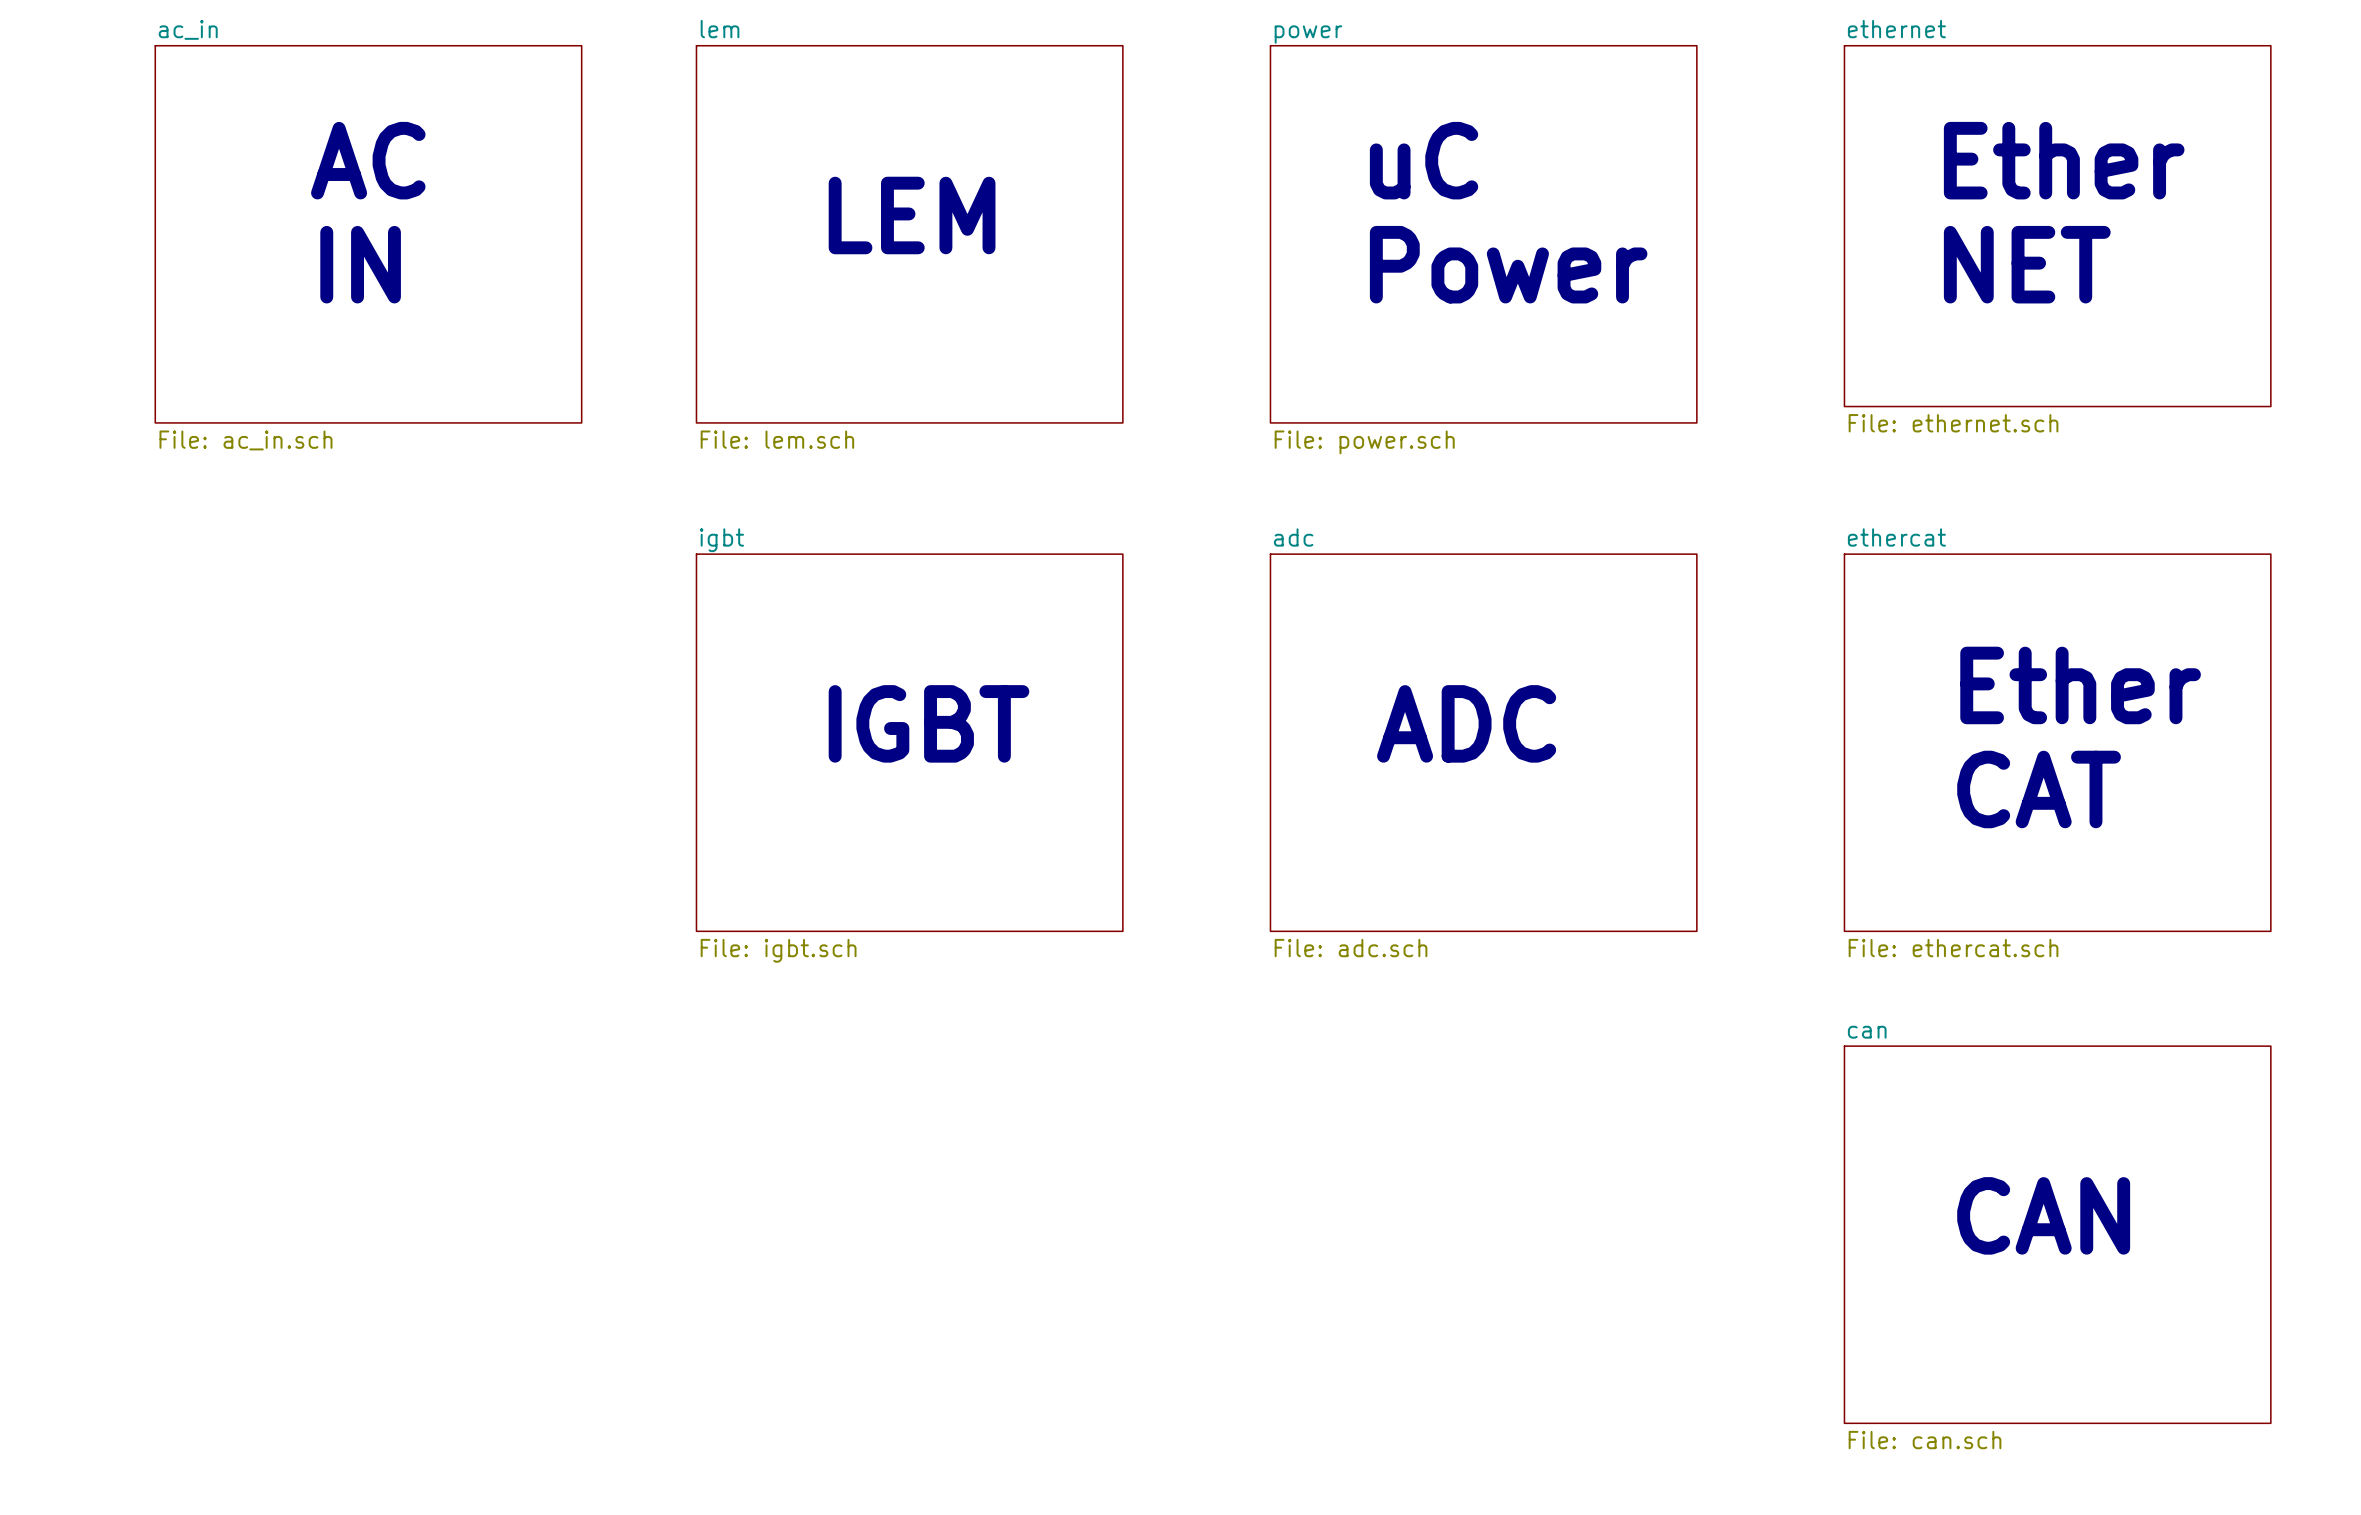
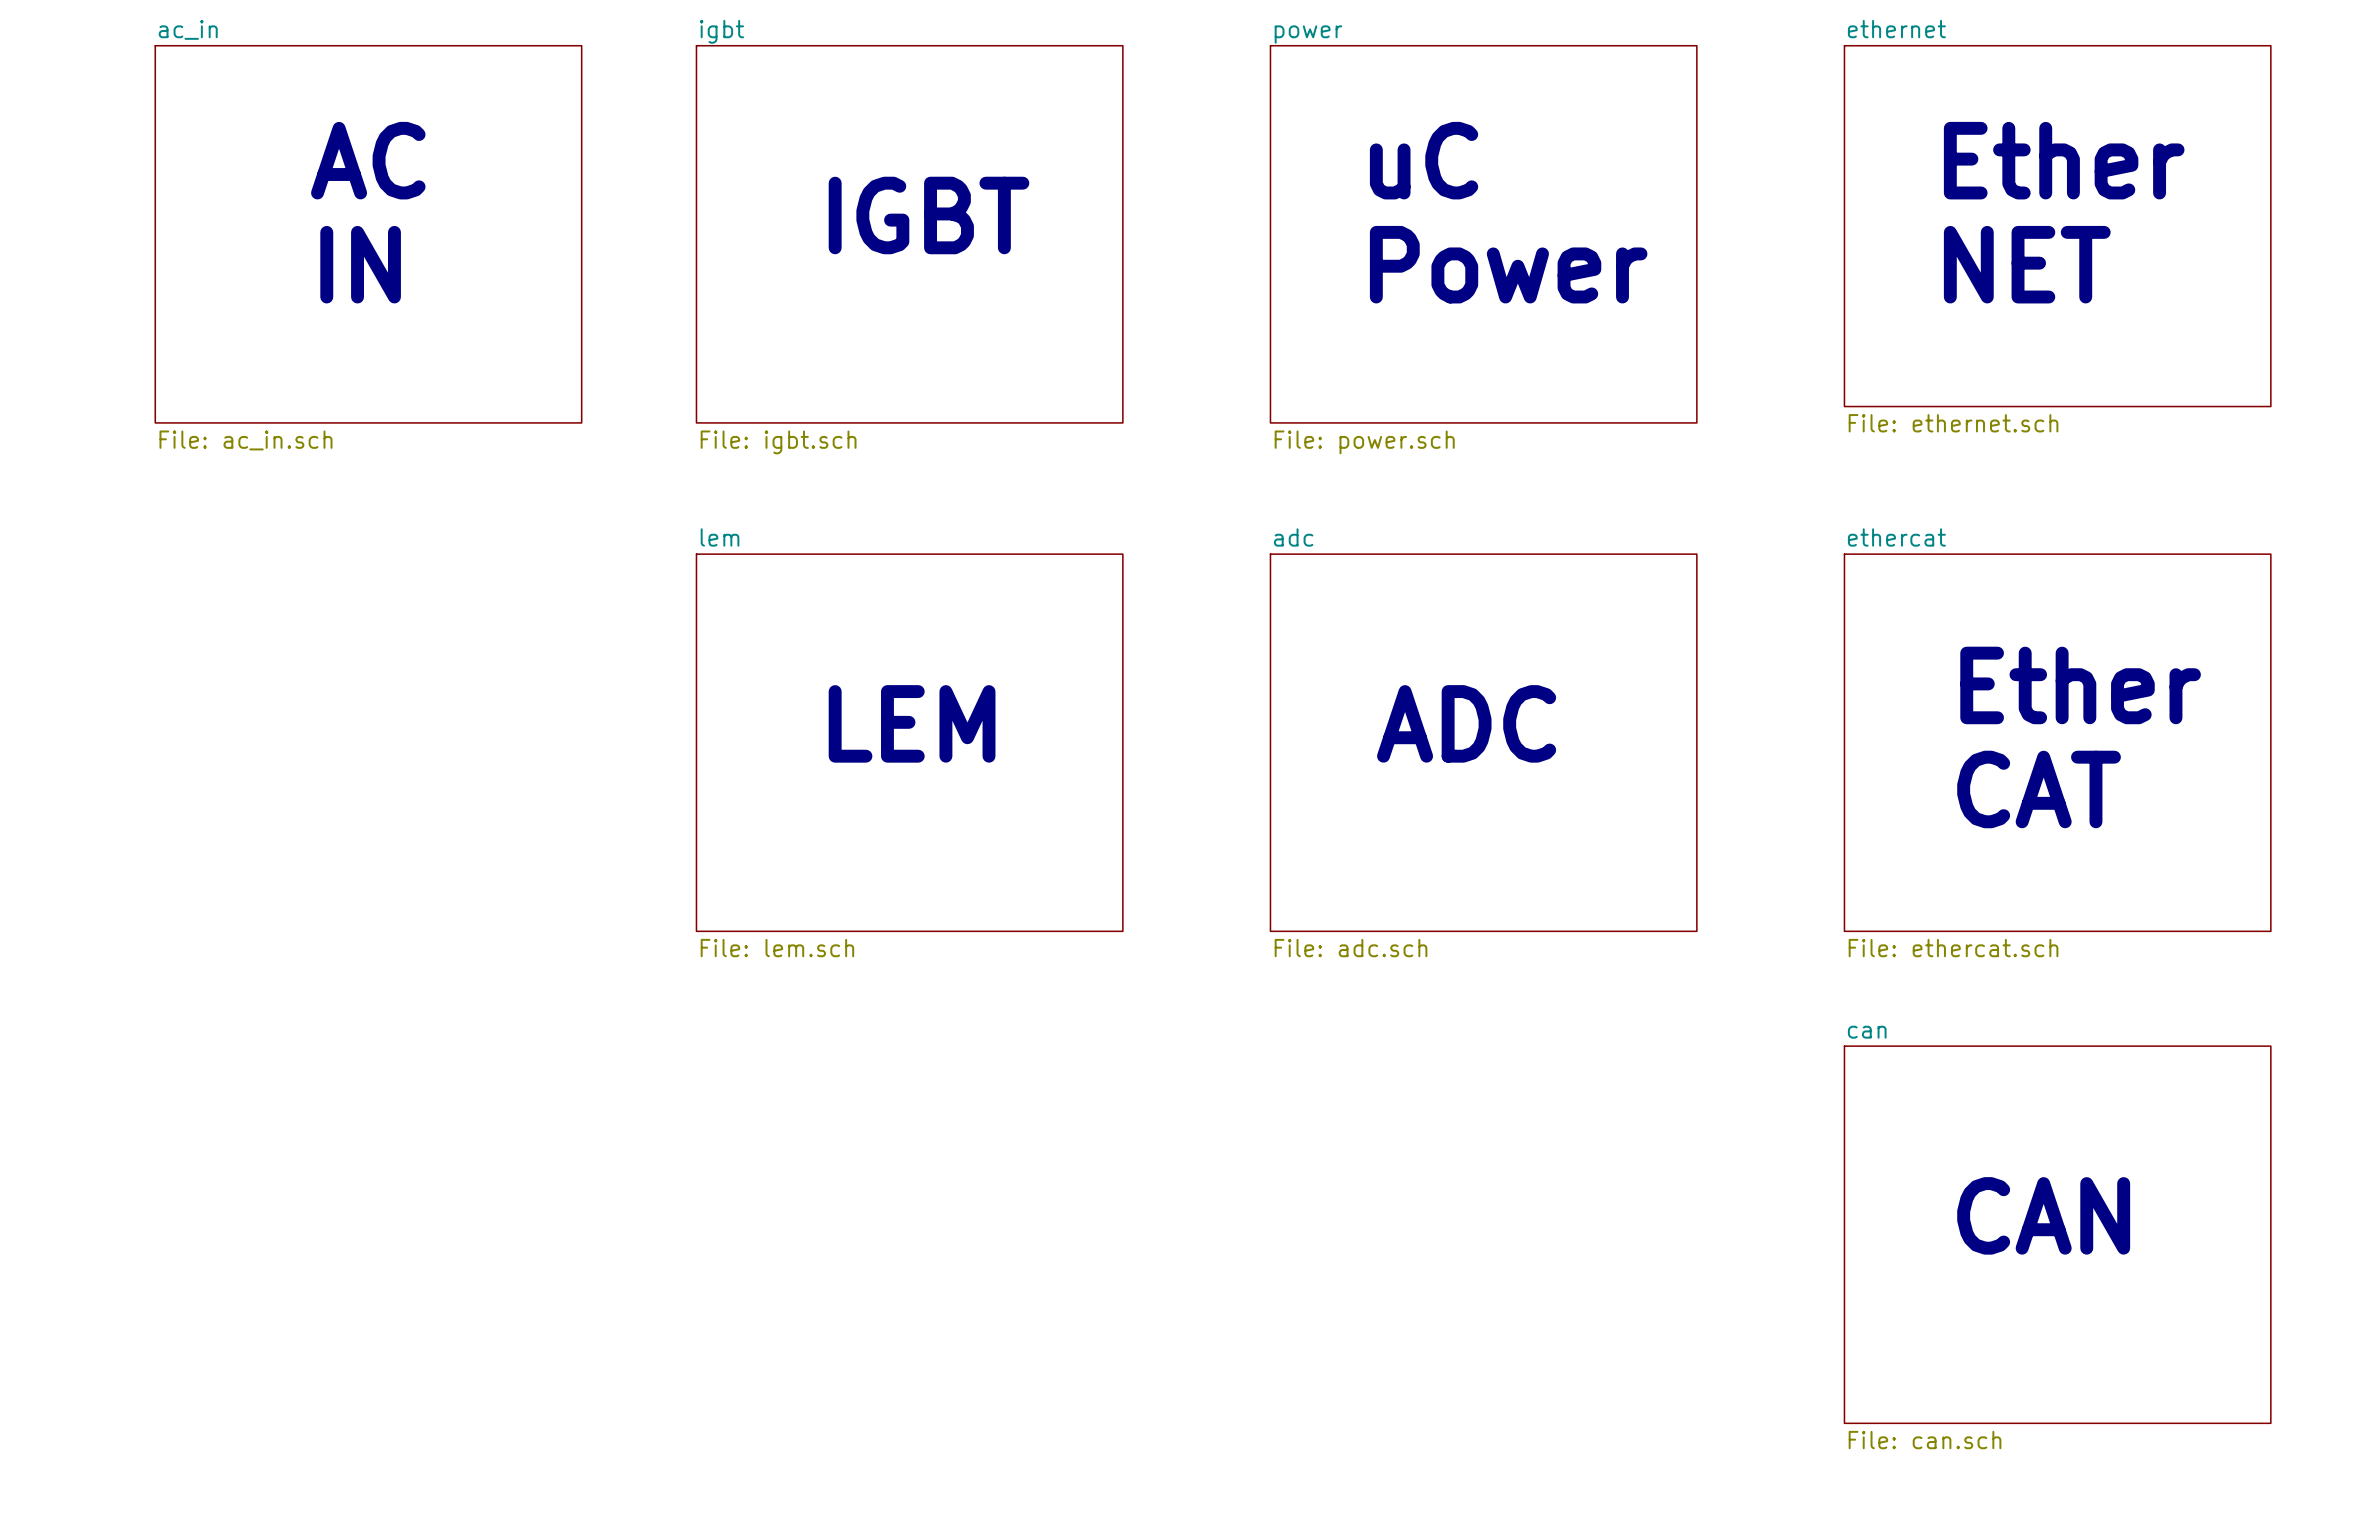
sheet lem name: lem (720, 29) -> igbt (721, 31)
text: LEM (912, 215) -> IGBT (929, 215)
sheet lem value: File: lem.sch (777, 439) -> File: igbt.sch (778, 442)
sheet igbt name: igbt (721, 540) -> lem (720, 537)
text: IGBT (929, 723) -> LEM (912, 723)
sheet igbt value: File: igbt.sch (778, 950) -> File: lem.sch (777, 948)

